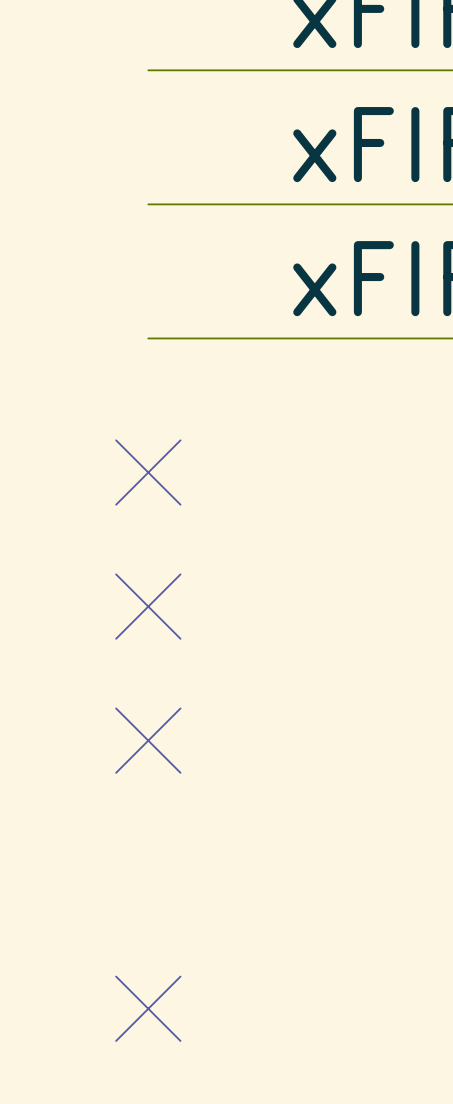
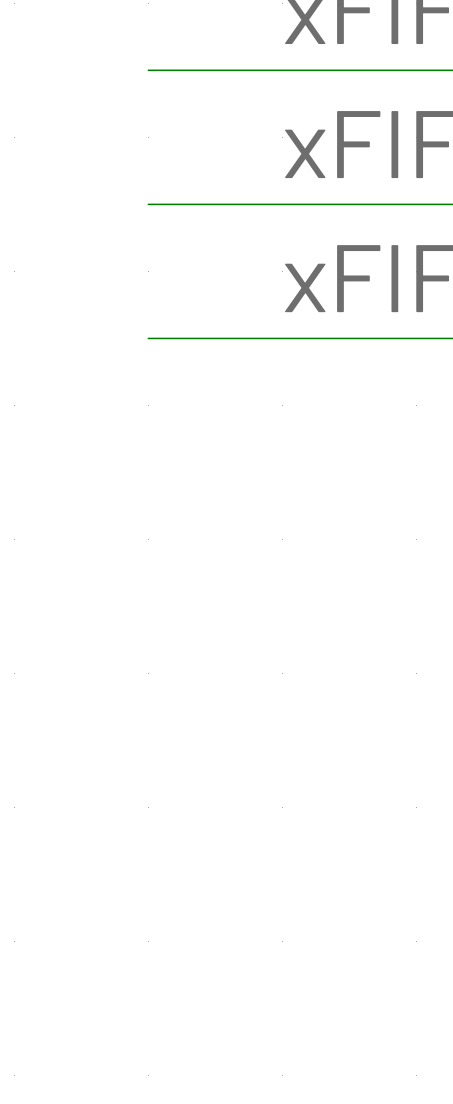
no-connect mark: (148, 472) -> none
no-connect mark: (148, 606) -> none
no-connect mark: (148, 740) -> none
no-connect mark: (148, 1008) -> none

